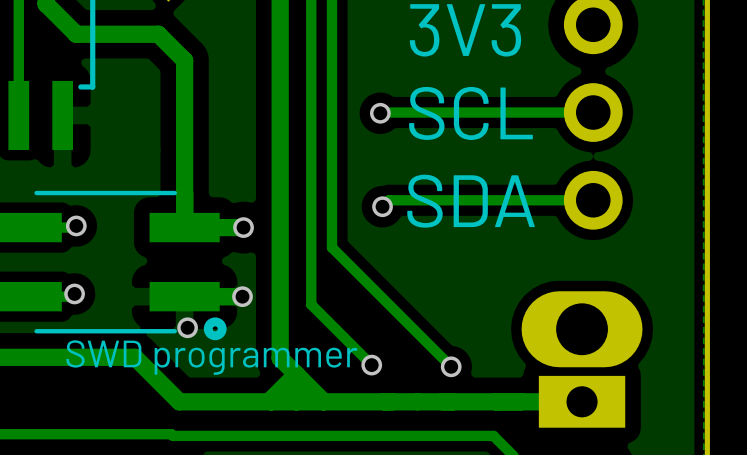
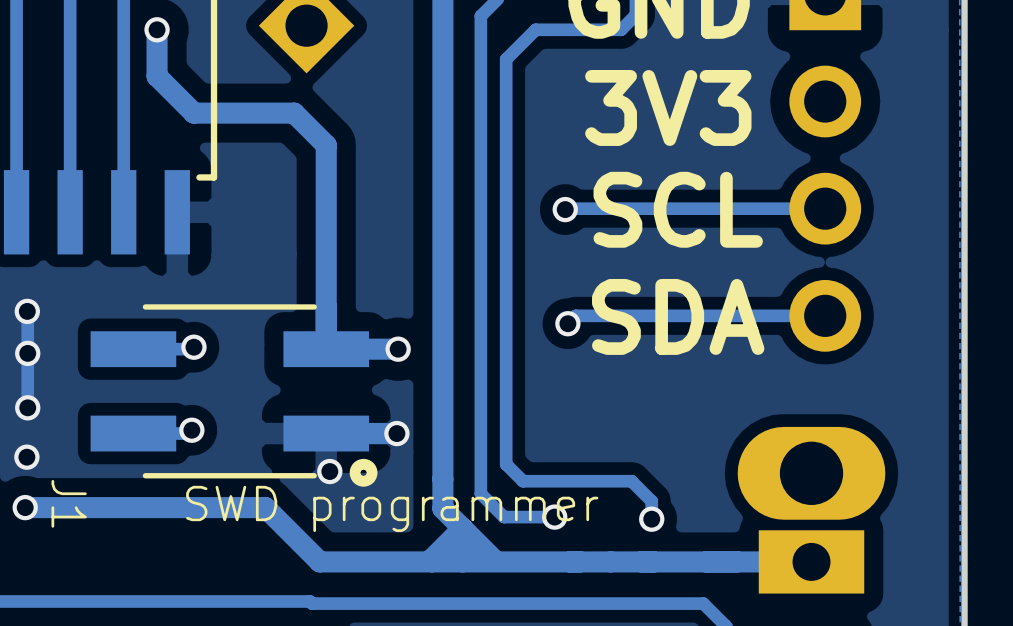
track: (332, 247) (451, 366) -> (506, 373) (506, 464) (523, 481) (631, 481) (651, 501) (651, 519)
track: (311, 304) (371, 365) -> (480, 443) (480, 493) (504, 517) (554, 517)

